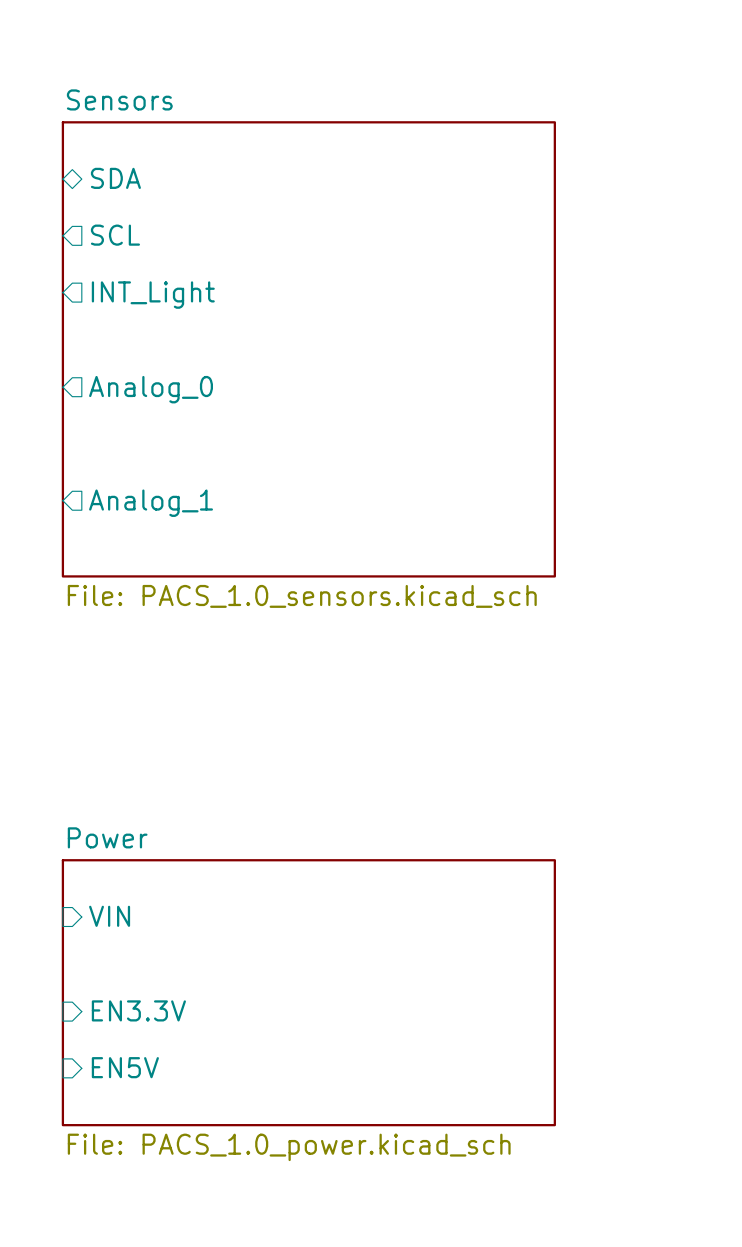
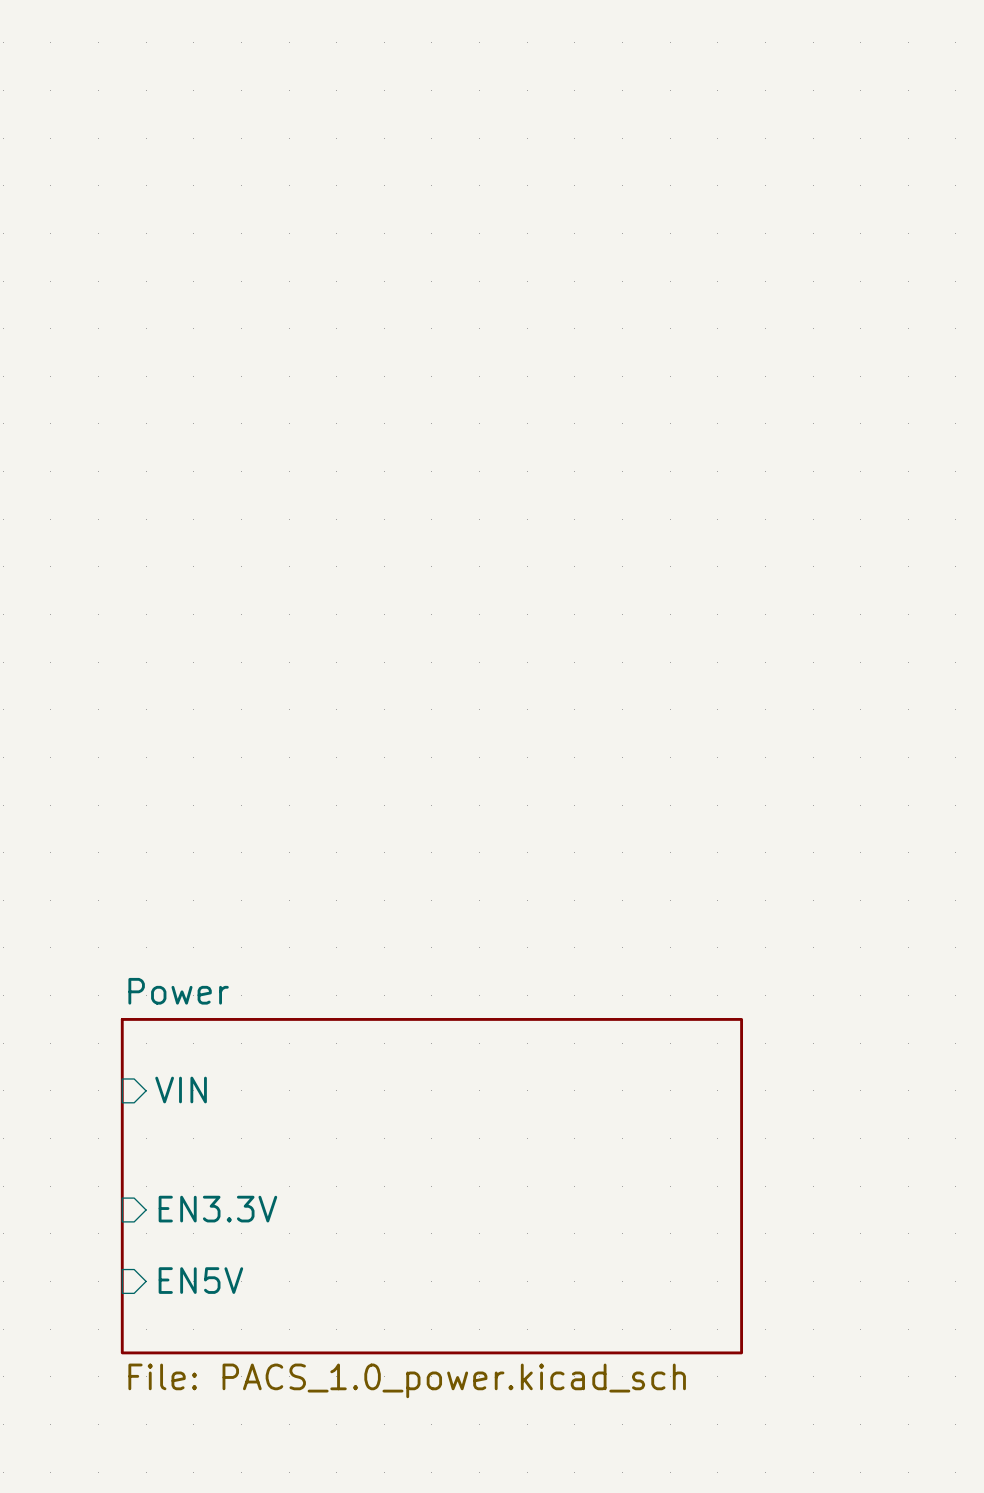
sheet pin: SDA (115, 178) -> none
sheet pin: SCL (115, 235) -> none
sheet pin: INT_Light (153, 295) -> none
sheet Sensors: File: PACS_1.0_sensors.kicad_sch (308, 349) -> none
sheet pin: Analog_0 (151, 389) -> none
sheet pin: Analog_1 (151, 503) -> none

